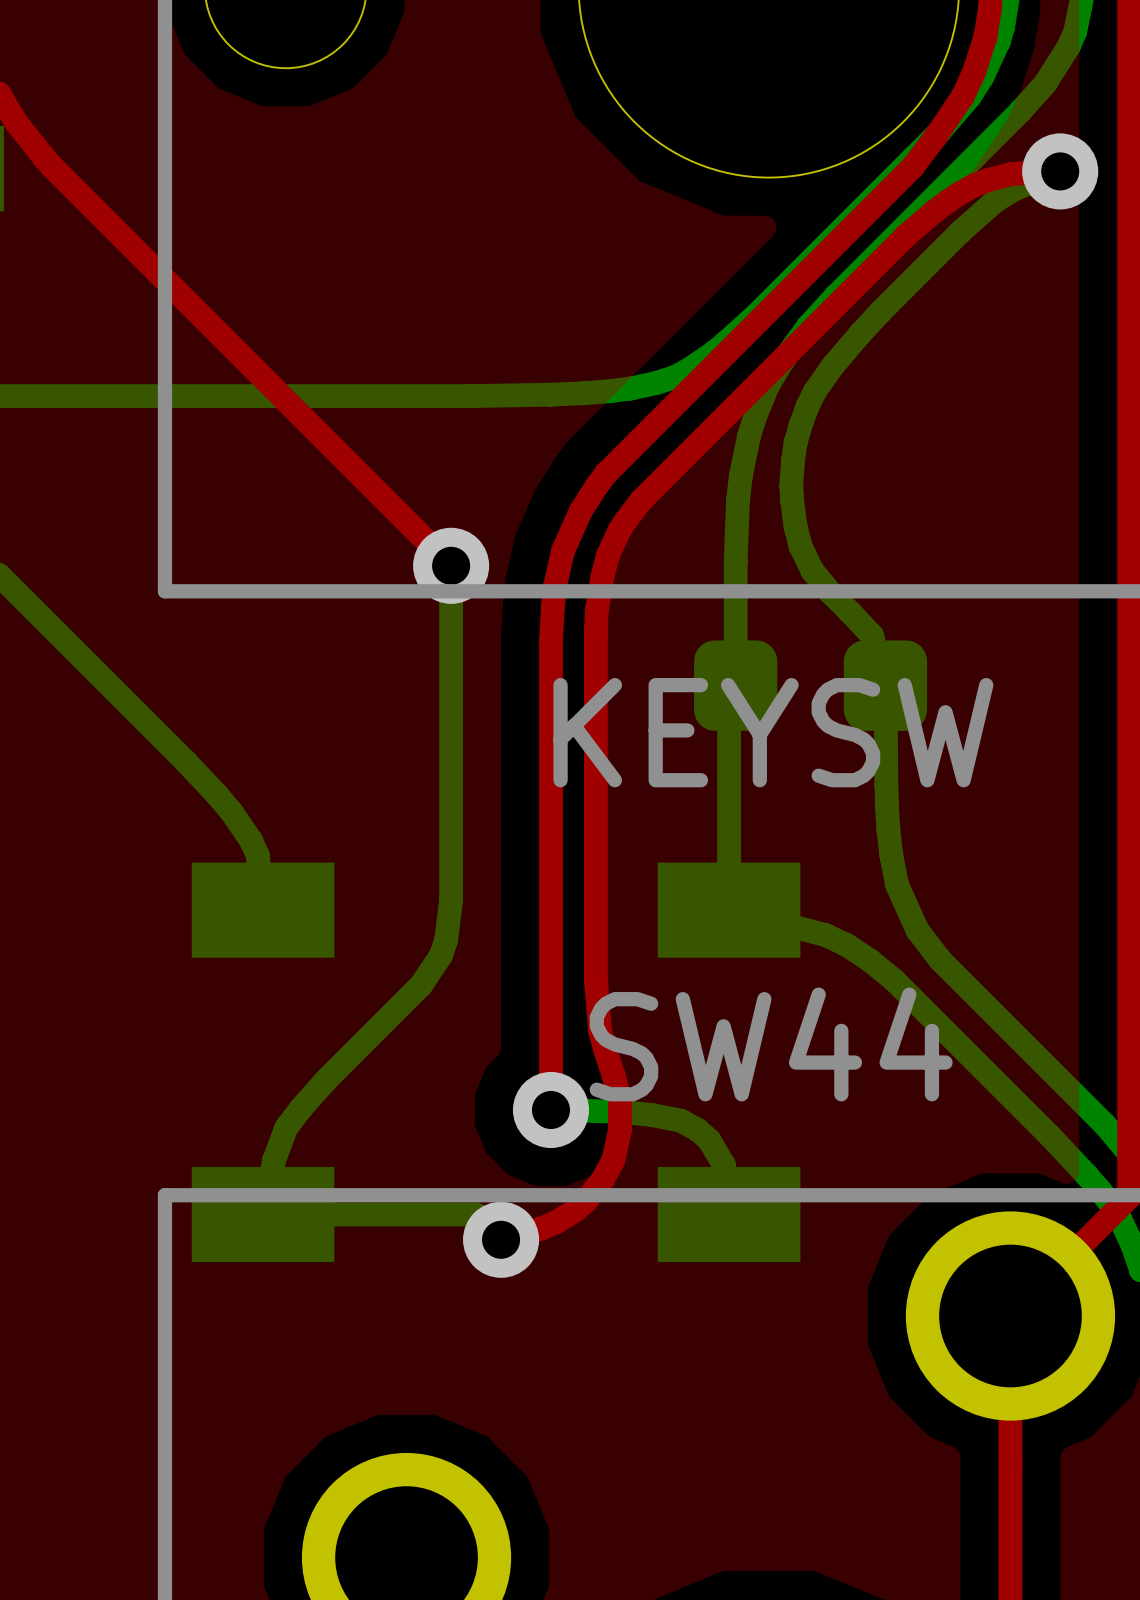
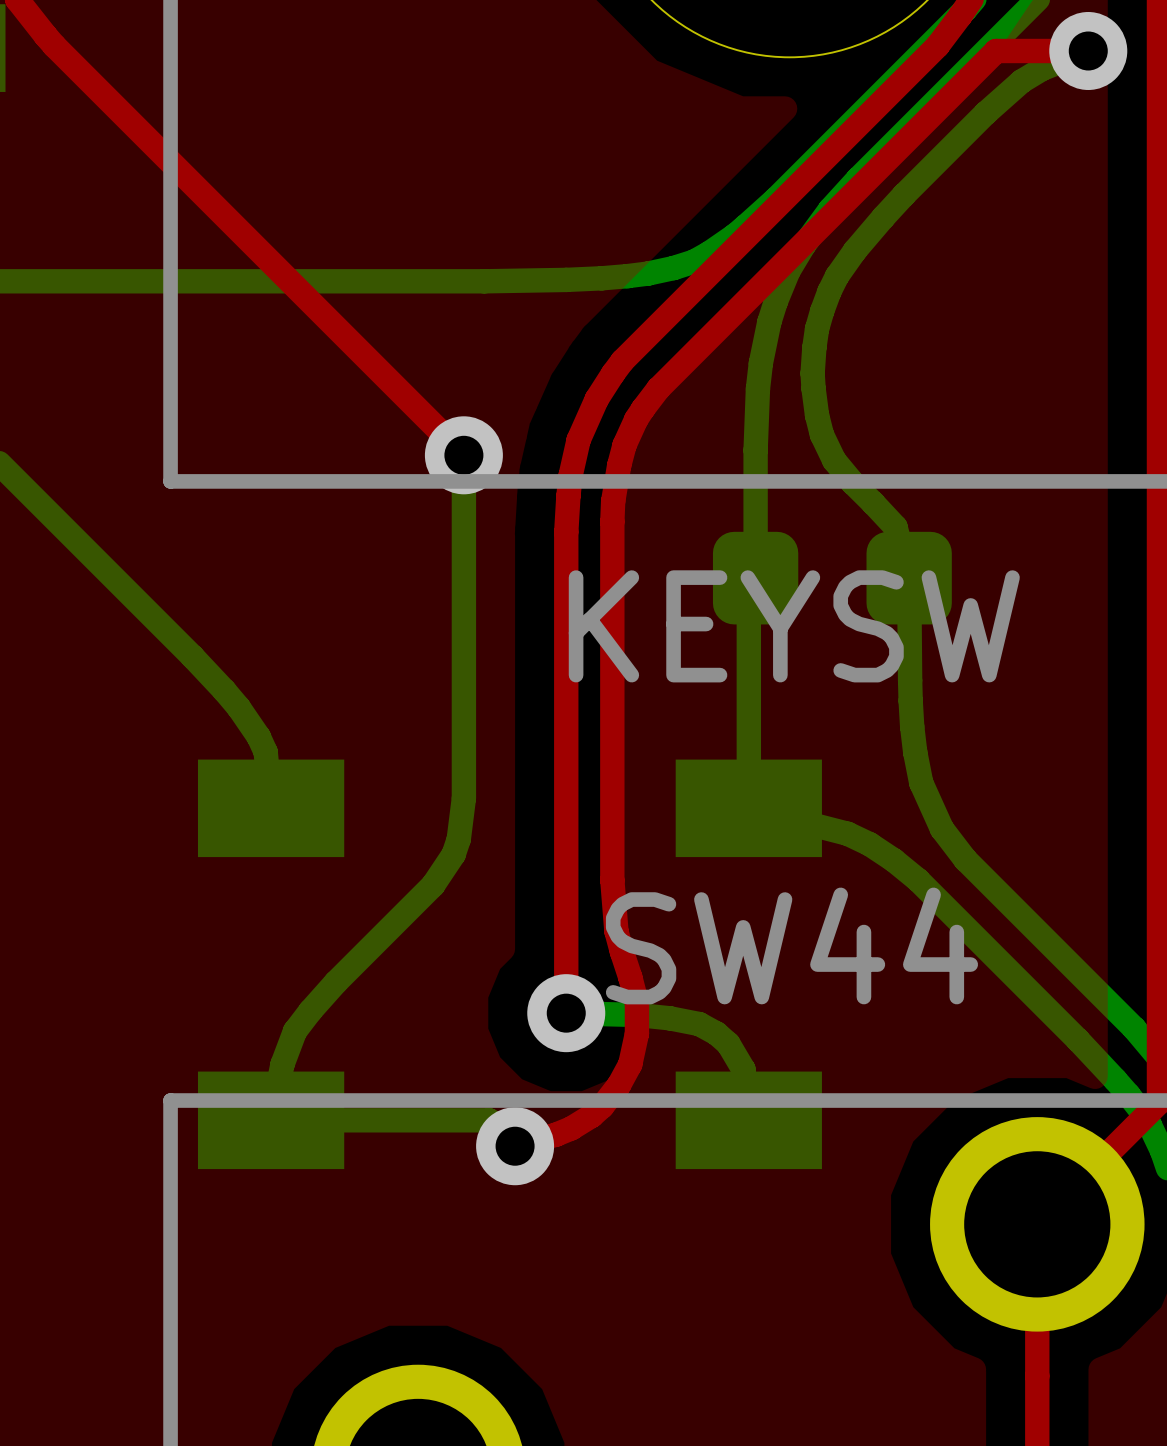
top track: (1060, 171) (1012, 173) (973, 185) (948, 200) (906, 235) -> (1088, 51) (996, 51) (930, 116)

